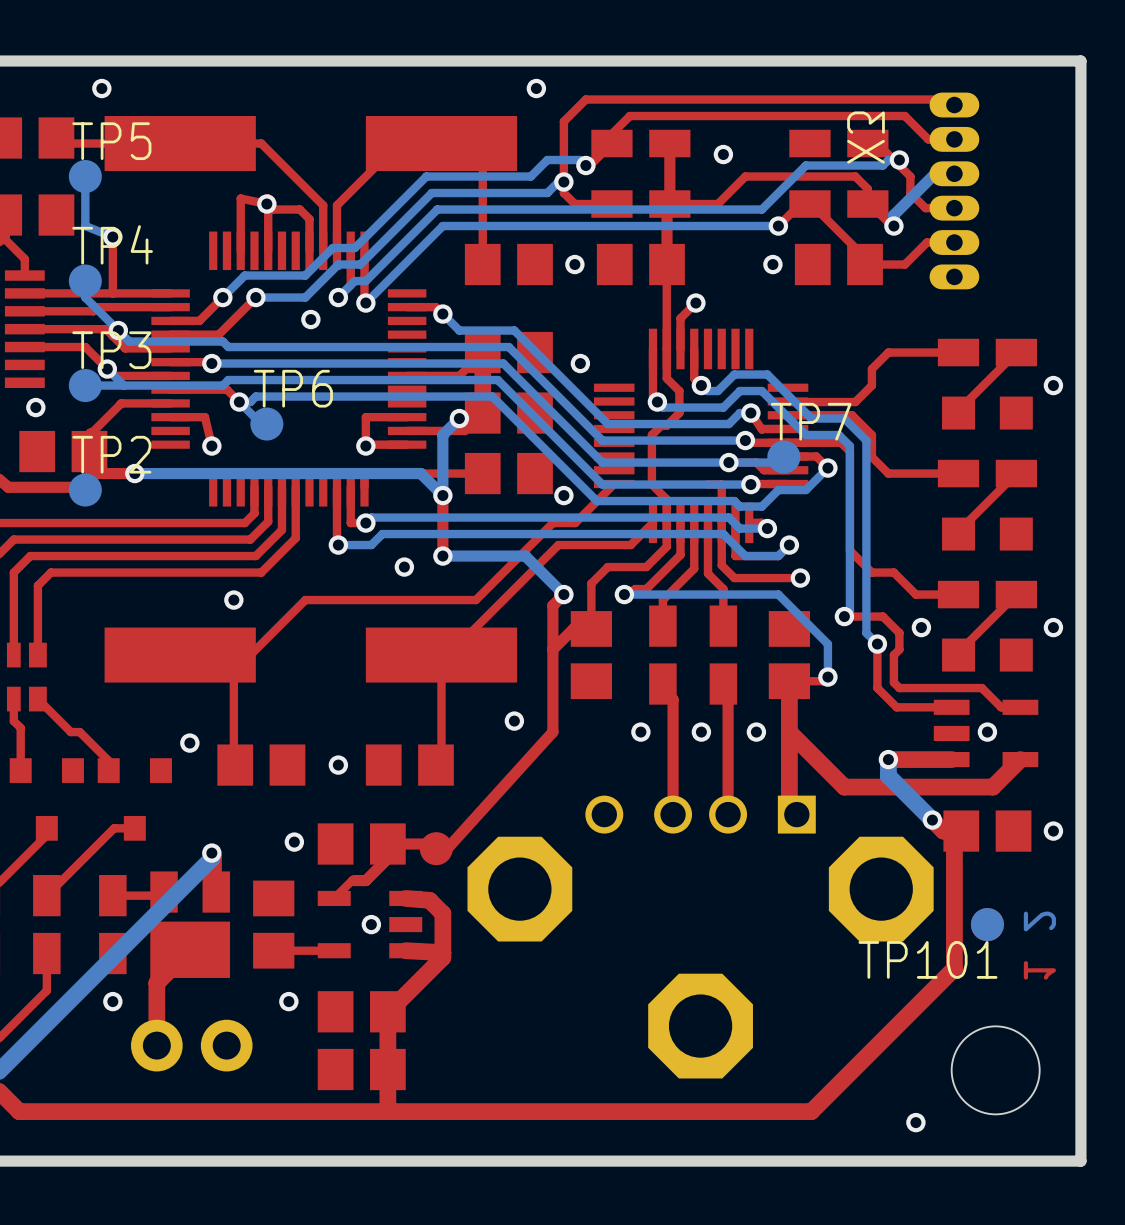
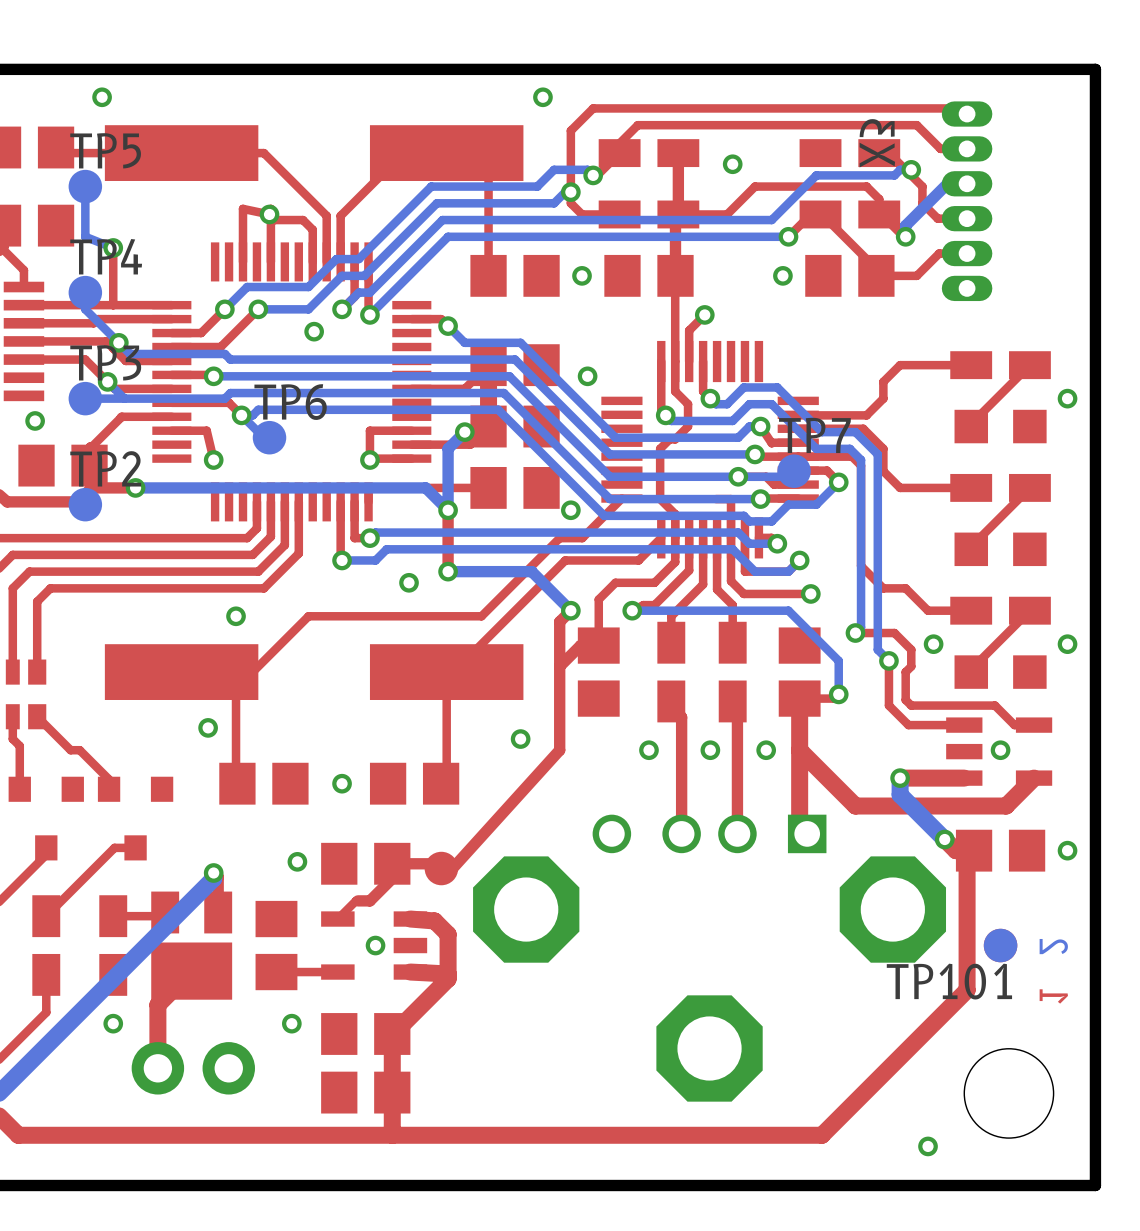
via position: (189, 743) -> (208, 727)

